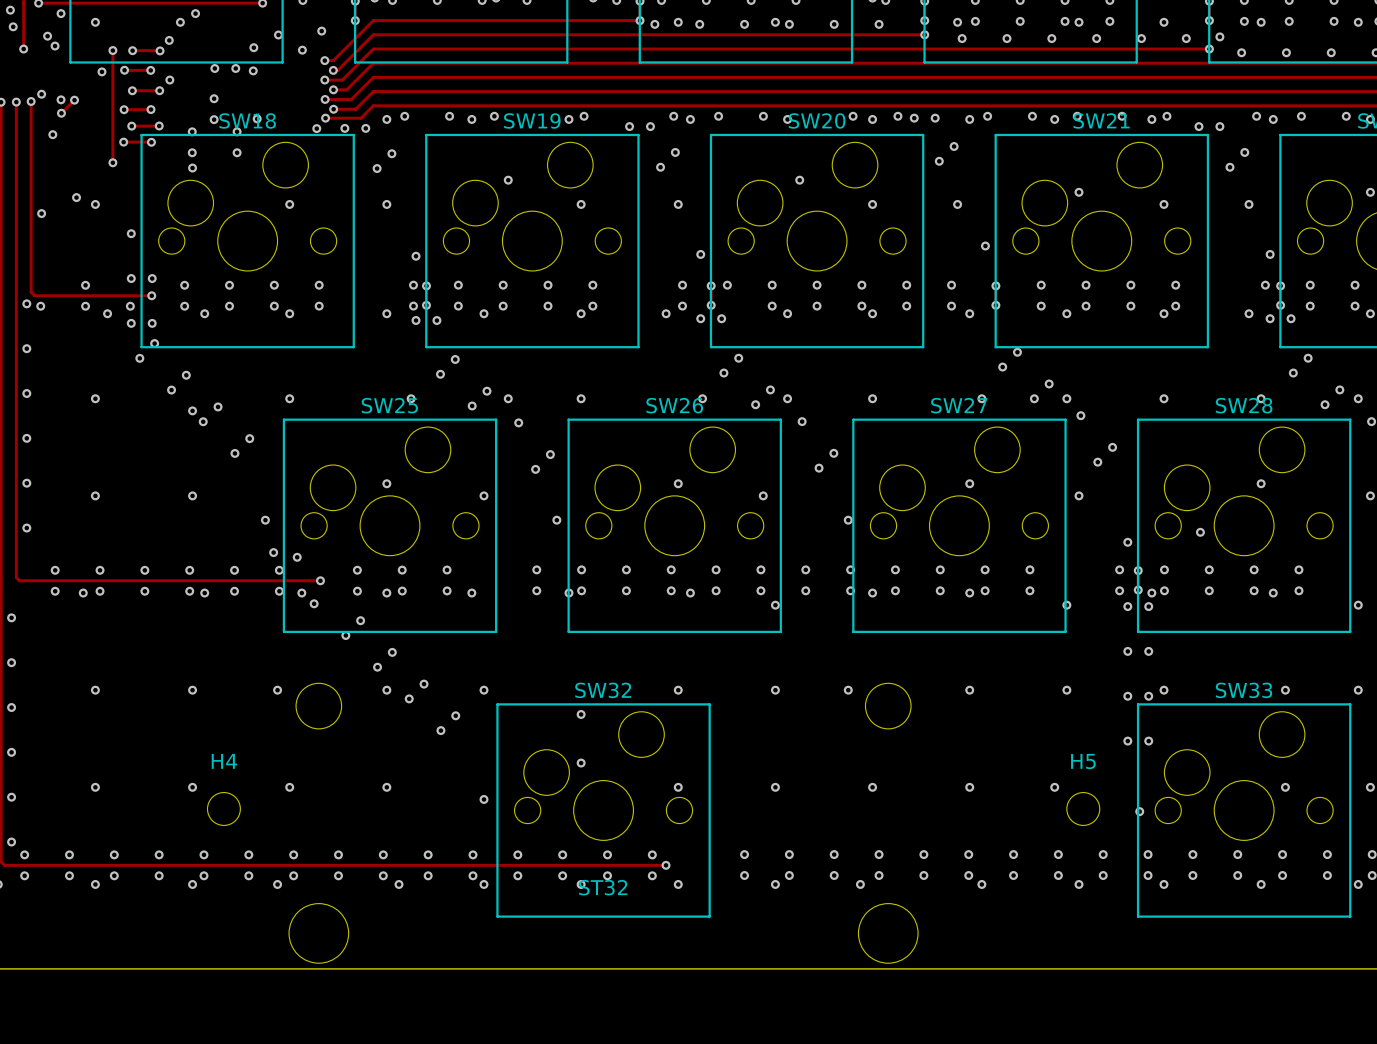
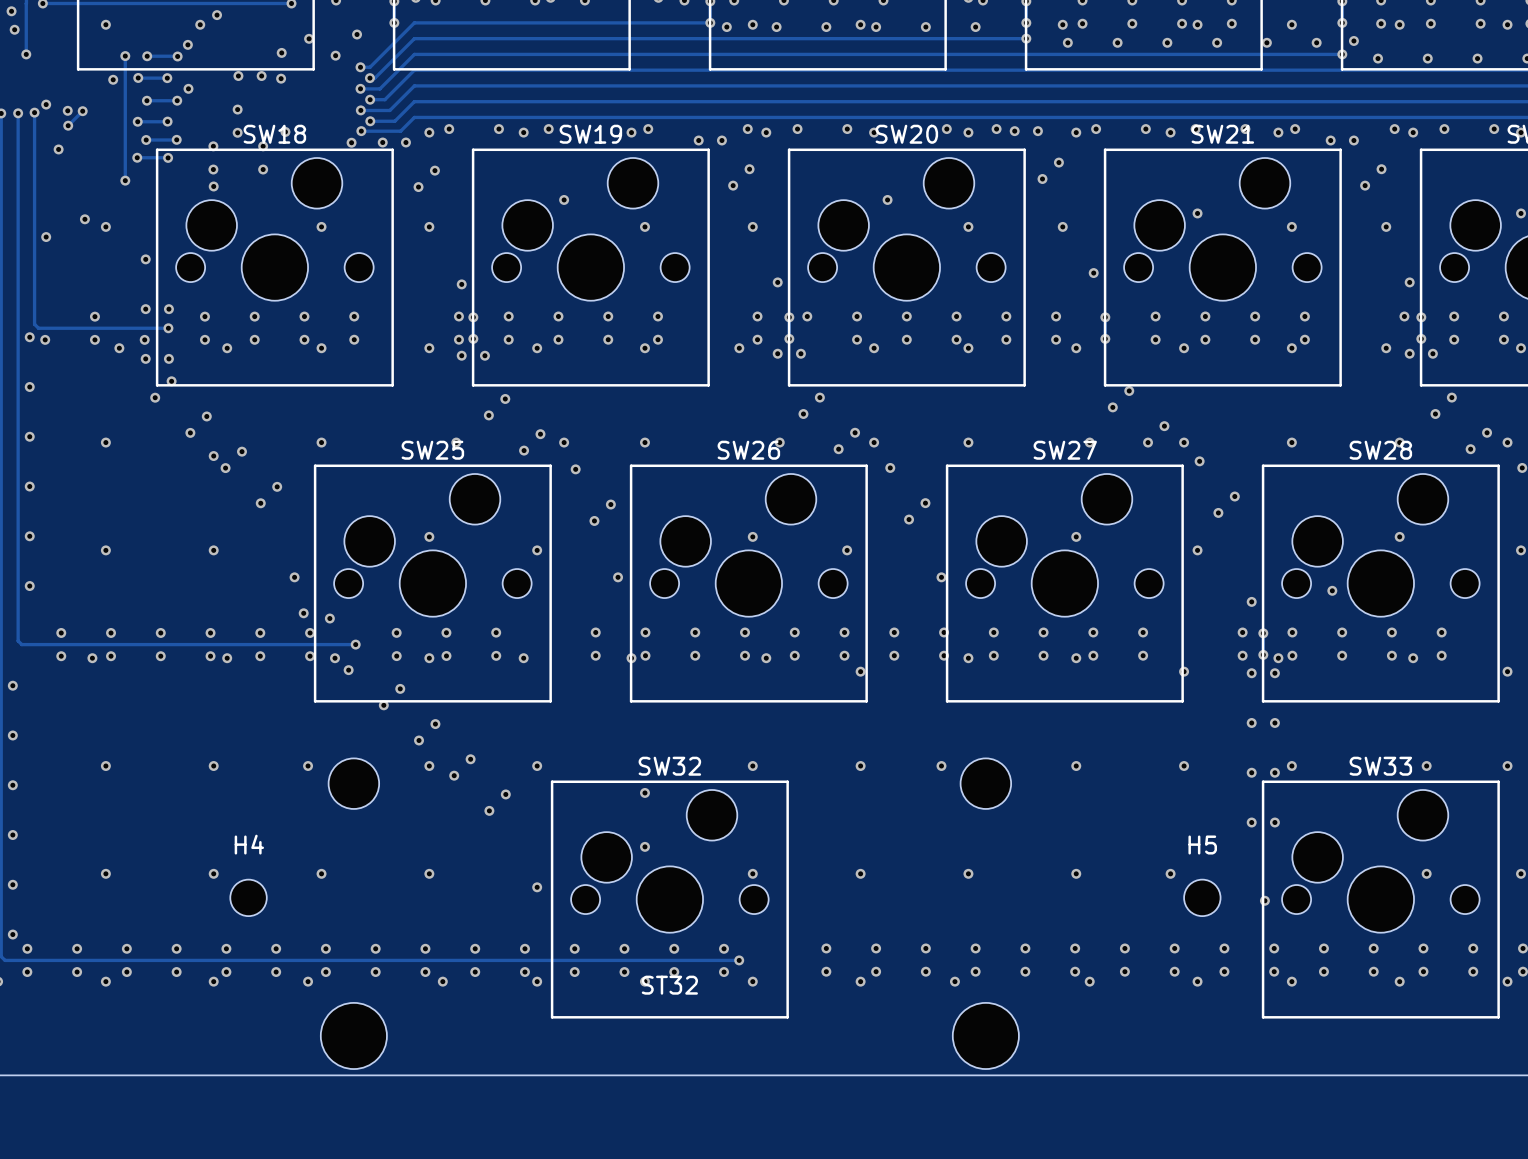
via: (61, 13) -> none
via: (47, 36) -> none
via: (55, 46) -> none

